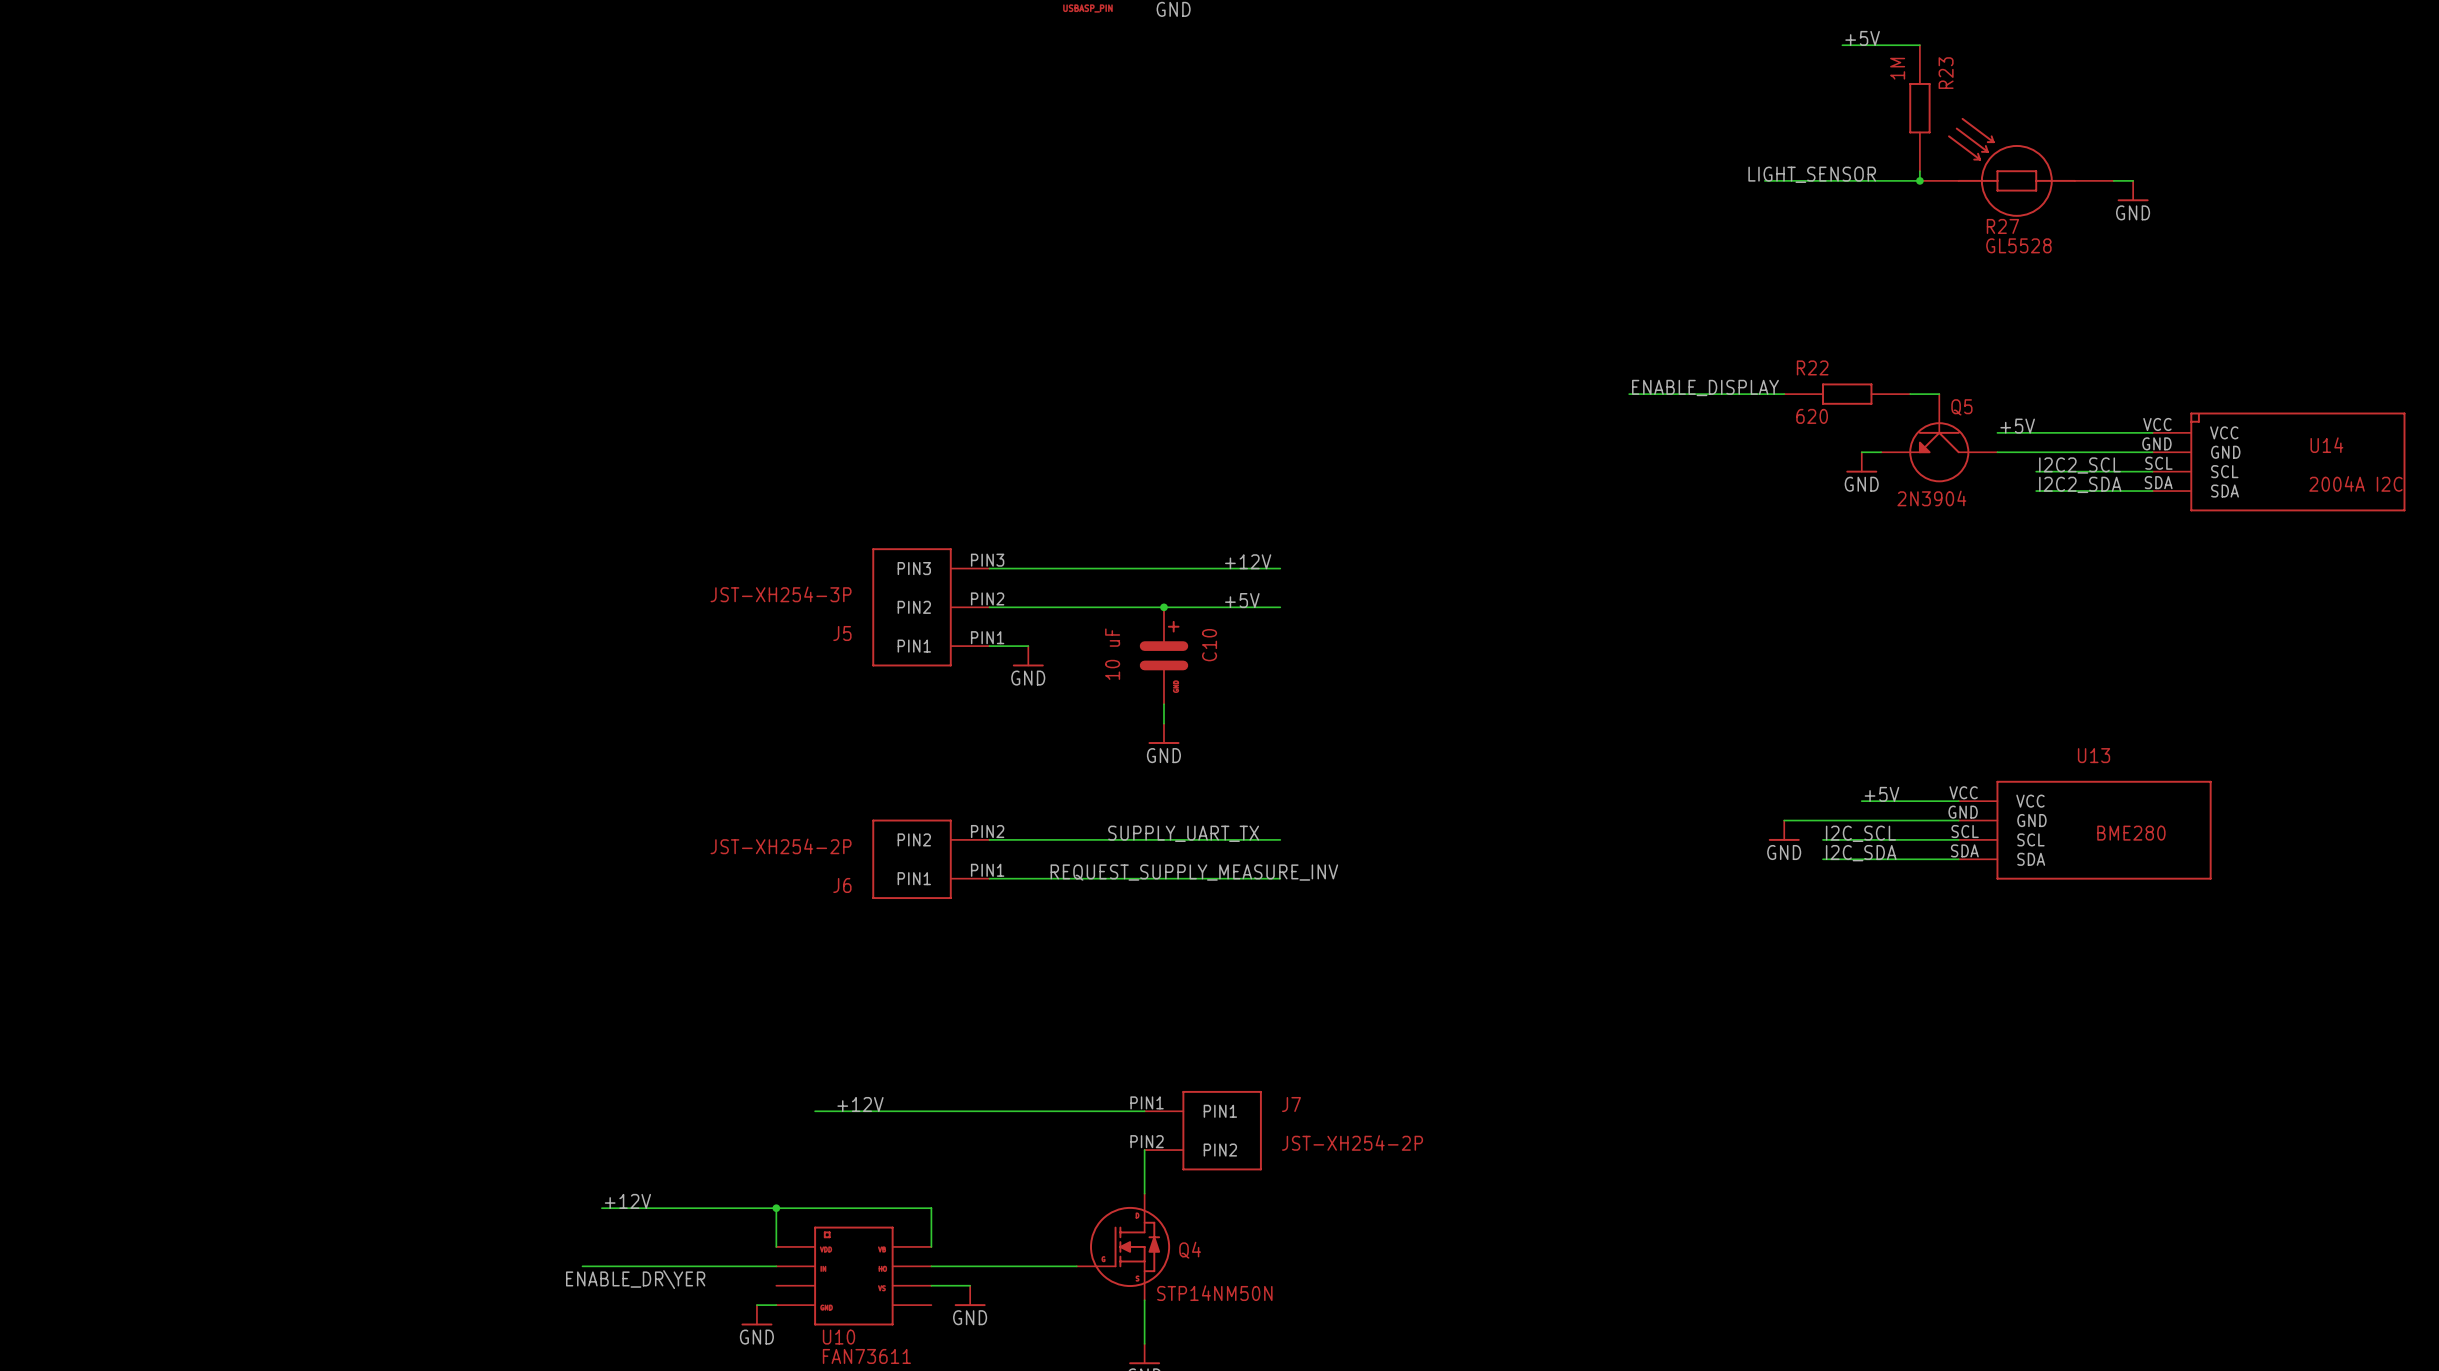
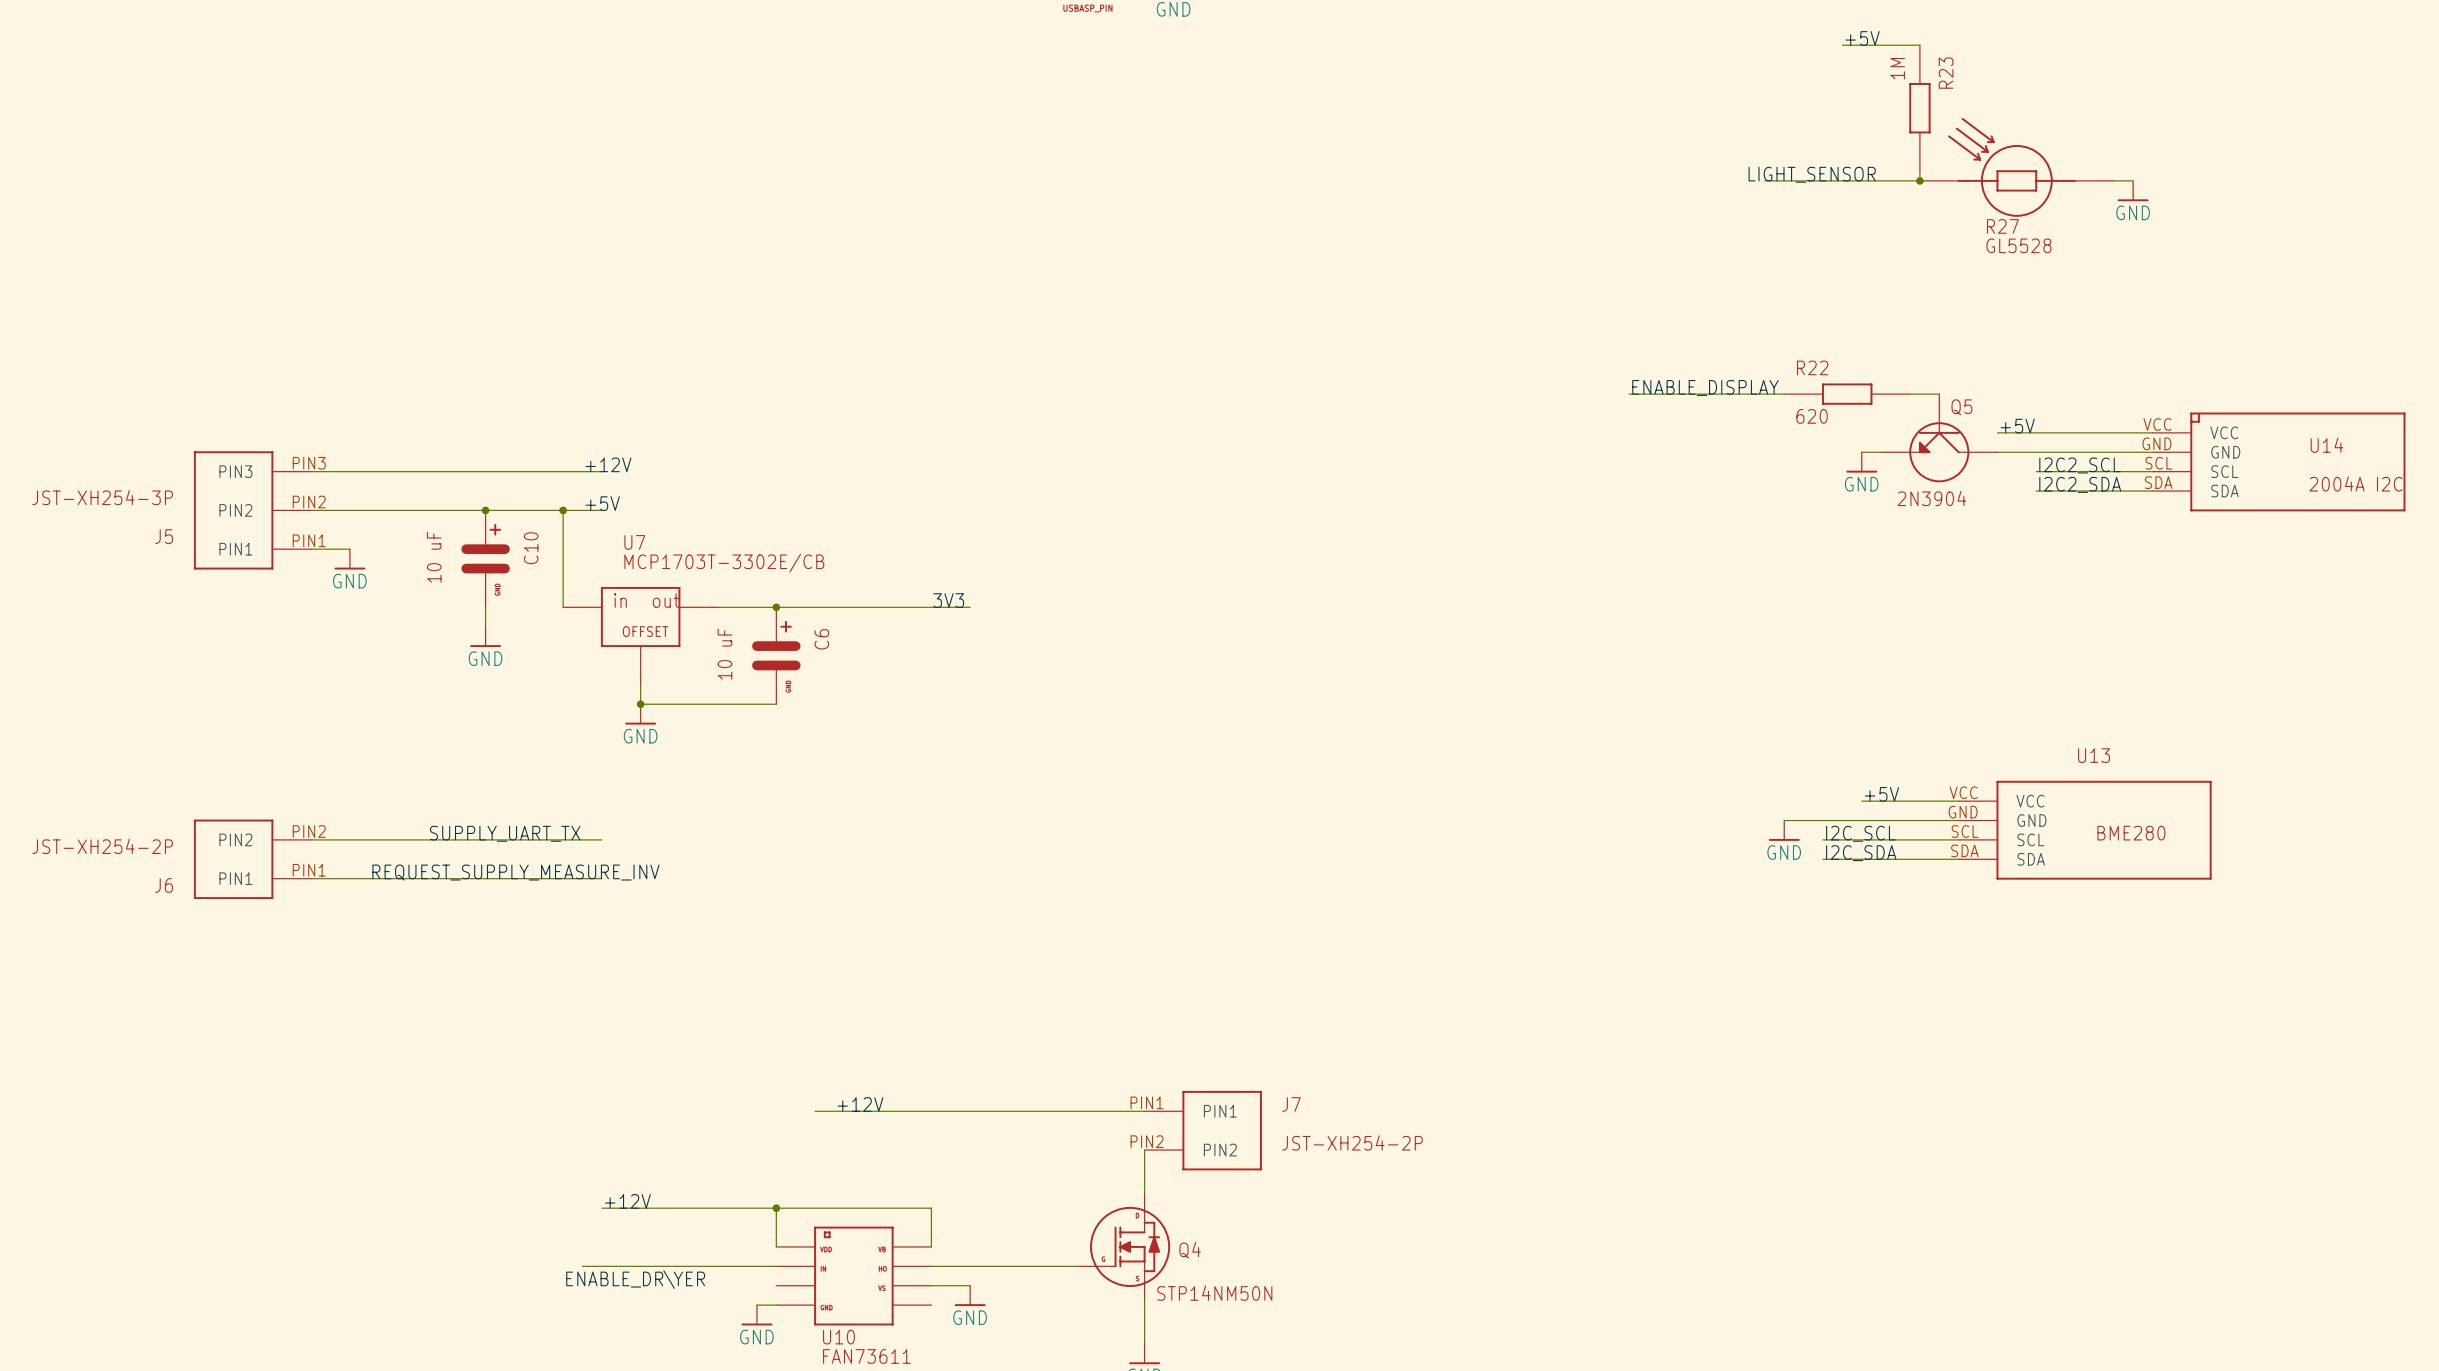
label: none -> +12V (608, 464)
wire: none -> (311, 471) (601, 471)
label: none -> +5V (602, 503)
wire: none -> (311, 510) (601, 510)
junction: none -> (485, 510)
wire: none -> (563, 510) (563, 607)
junction: none -> (563, 510)
wire: none -> (311, 549) (349, 549)
power symbol: none -> GND (349, 559)
label: +12V (1248, 561) -> none
wire: (989, 568) (1280, 568) -> none
label: none -> 3V3 (948, 600)
label: +5V (1242, 600) -> none
wire: none -> (485, 607) (485, 626)
wire: none -> (718, 607) (970, 607)
junction: none -> (776, 607)
J5 position: (930, 607) -> (252, 510)
wire: (989, 607) (1280, 607) -> none
junction: (1163, 607) -> none
U7: none -> MCP1703T-3302E/CB (640, 635)
power symbol: none -> GND (485, 636)
wire: (989, 646) (1028, 646) -> none
C6: none -> 10 uF (776, 655)
C10 position: (1163, 655) -> (485, 558)
power symbol: GND (1028, 656) -> none
wire: none -> (640, 684) (640, 704) (776, 704)
junction: none -> (640, 704)
wire: (1163, 704) (1163, 723) -> none
power symbol: none -> GND (640, 714)
power symbol: GND (1163, 733) -> none
label: none -> SUPPLY_UART_TX (505, 833)
label: SUPPLY_UART_TX (1183, 833) -> none
wire: none -> (311, 839) (601, 839)
wire: (989, 839) (1280, 839) -> none
J6 position: (930, 859) -> (252, 859)
label: none -> REQUEST_SUPPLY_MEASURE_INV (515, 872)
label: REQUEST_SUPPLY_MEASURE_INV (1194, 872) -> none
wire: none -> (311, 878) (601, 878)
wire: (989, 878) (1280, 878) -> none

